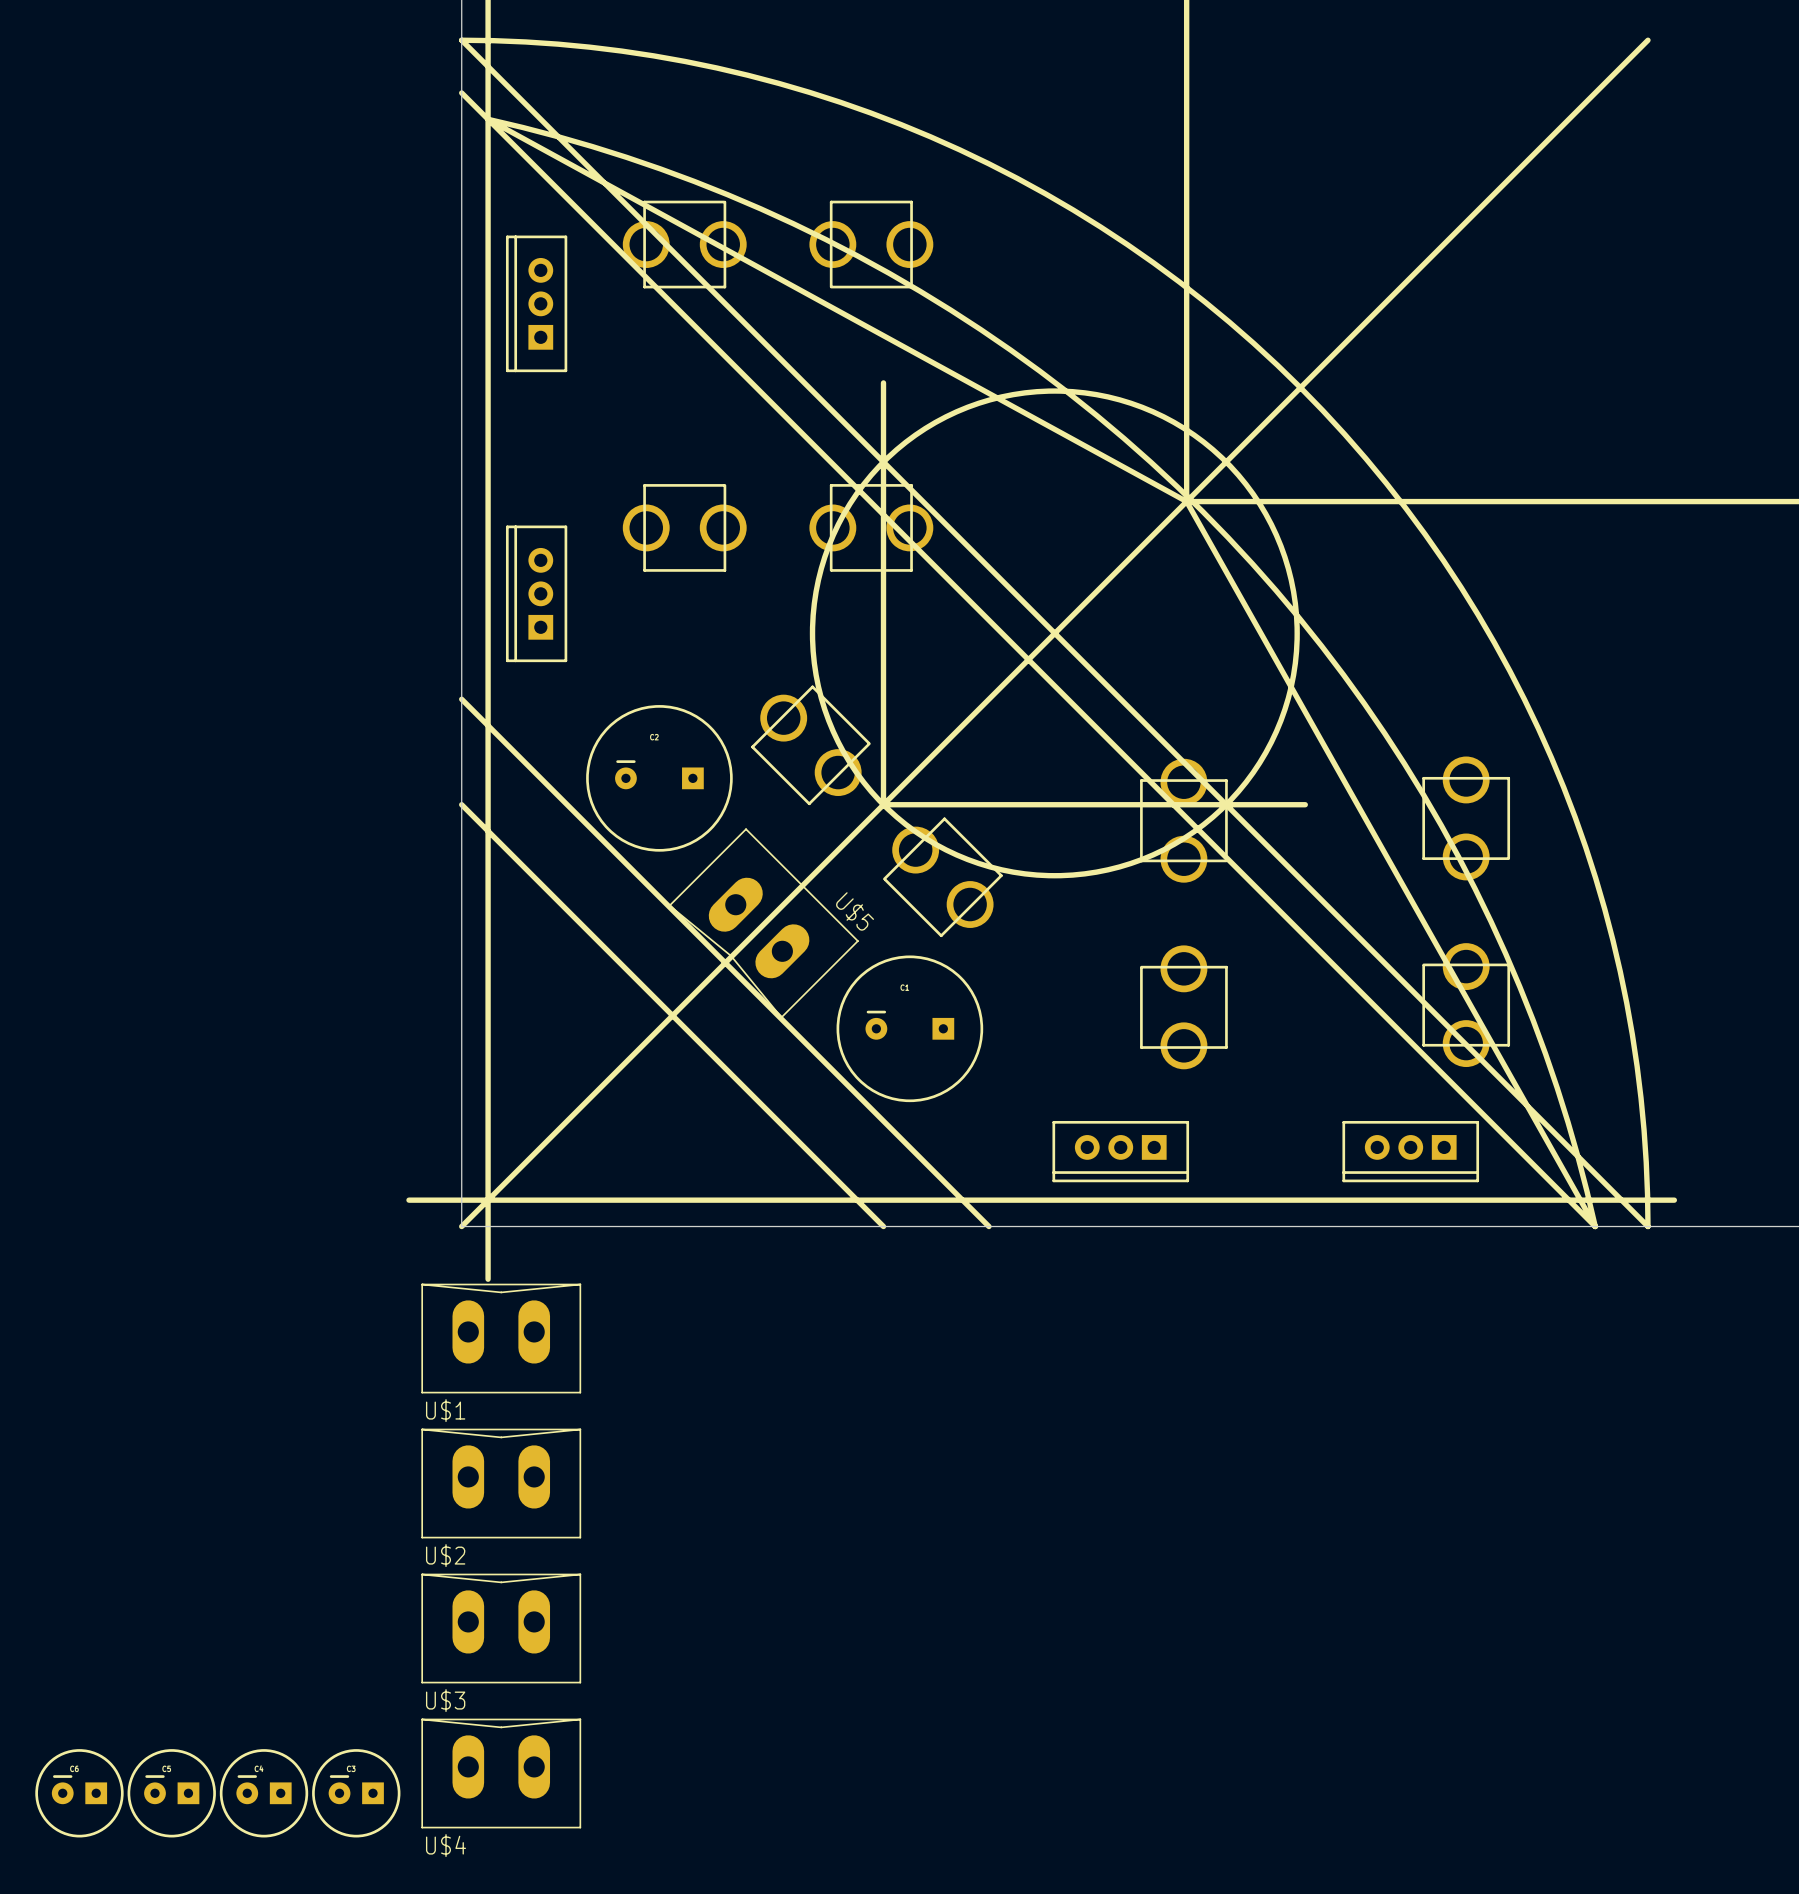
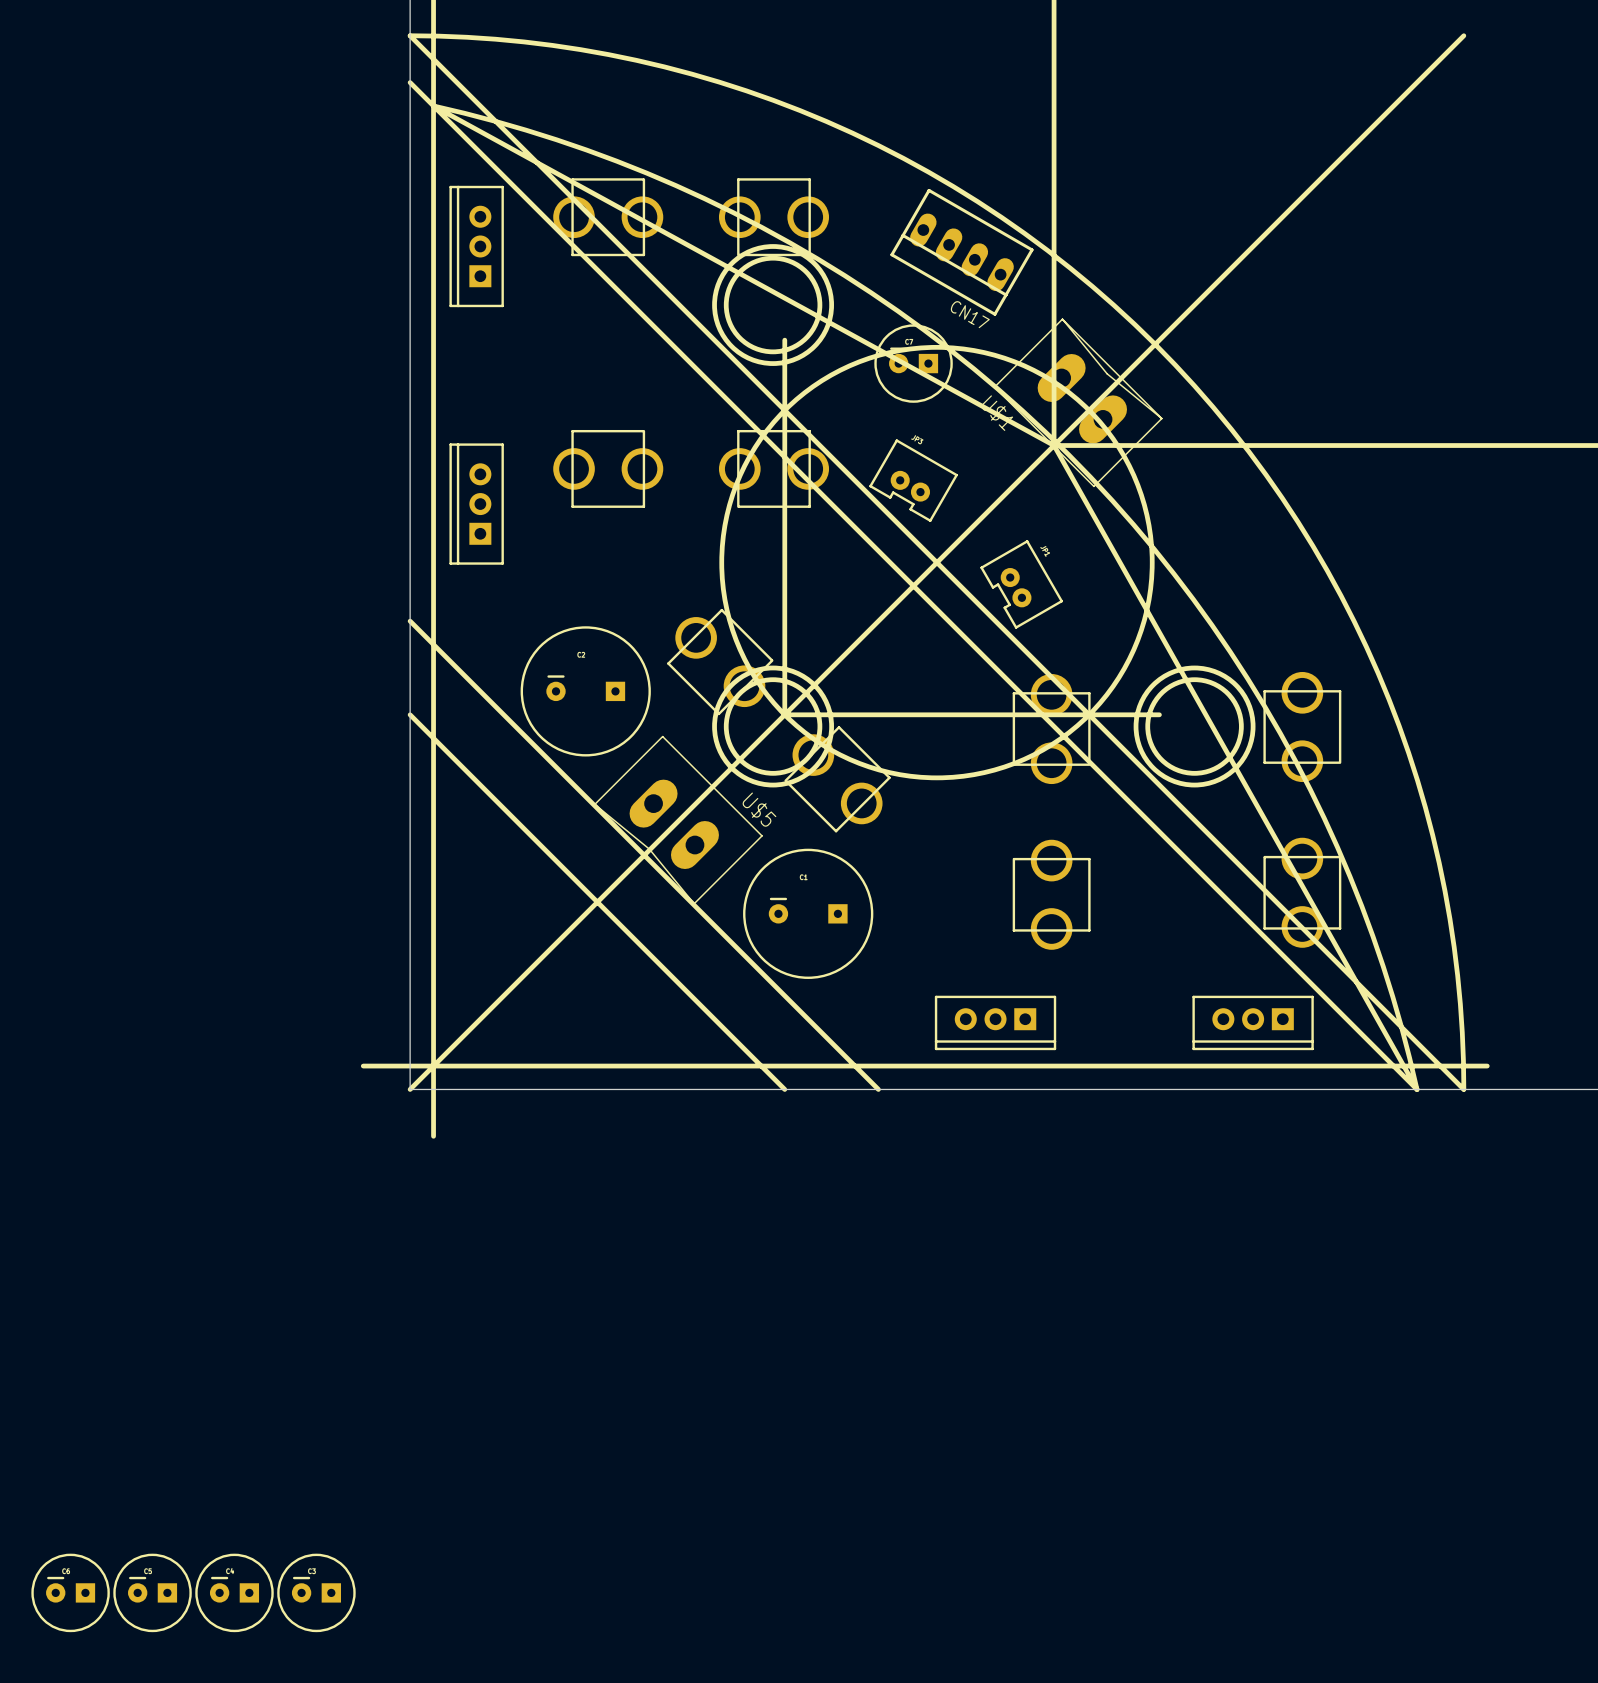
drawing: none -> [712, 244, 834, 366]
CN17: none -> (961, 252)
part position: (536, 303) -> (476, 246)
part: none -> (913, 363)
part: none -> (913, 480)
part position: (536, 593) -> (476, 504)
part: none -> (1021, 584)
drawing: none -> [712, 665, 834, 788]
drawing: none -> [1133, 665, 1256, 788]
U$1 rotation: 0° (501, 1338) -> 45° clockwise (1078, 402)
U$1 position: (501, 1338) -> (1078, 402)
U$2: (501, 1483) -> none
U$3: (501, 1628) -> none
U$4: (501, 1773) -> none

